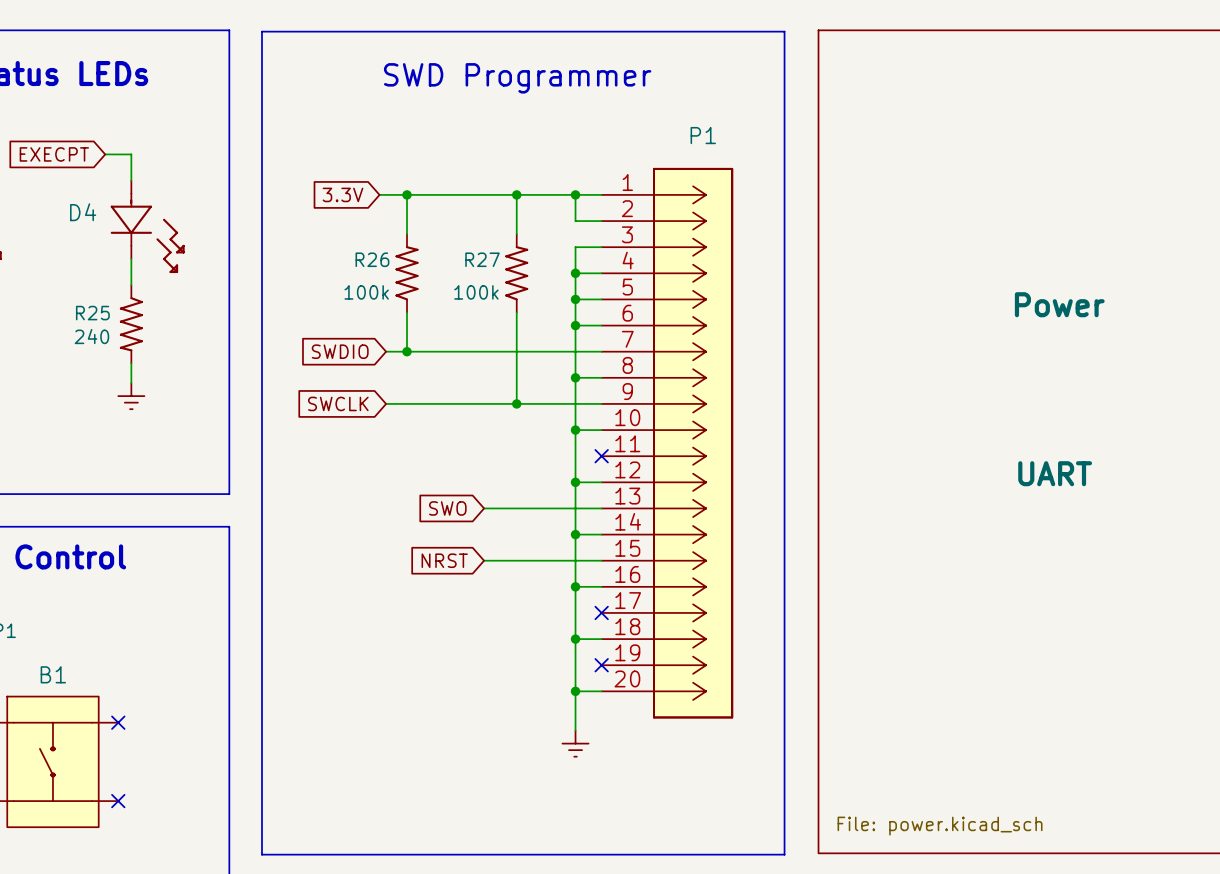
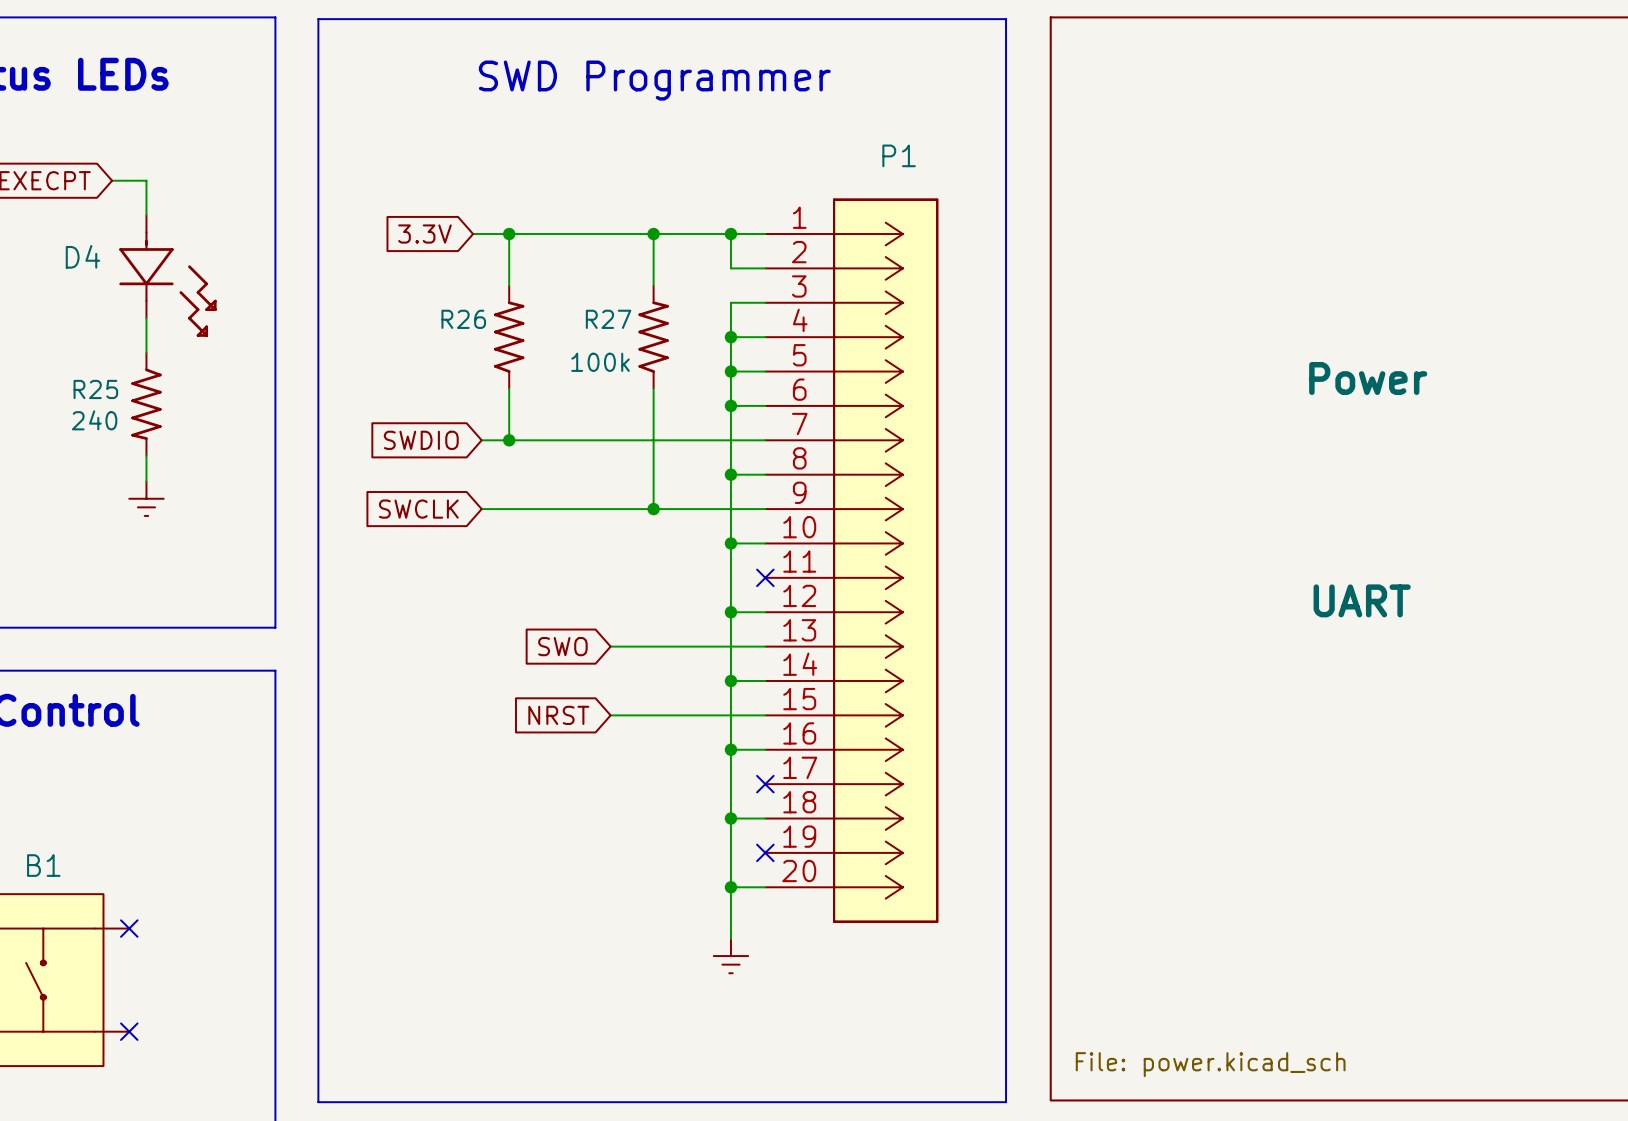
R26 value: 100k (366, 292) -> none

